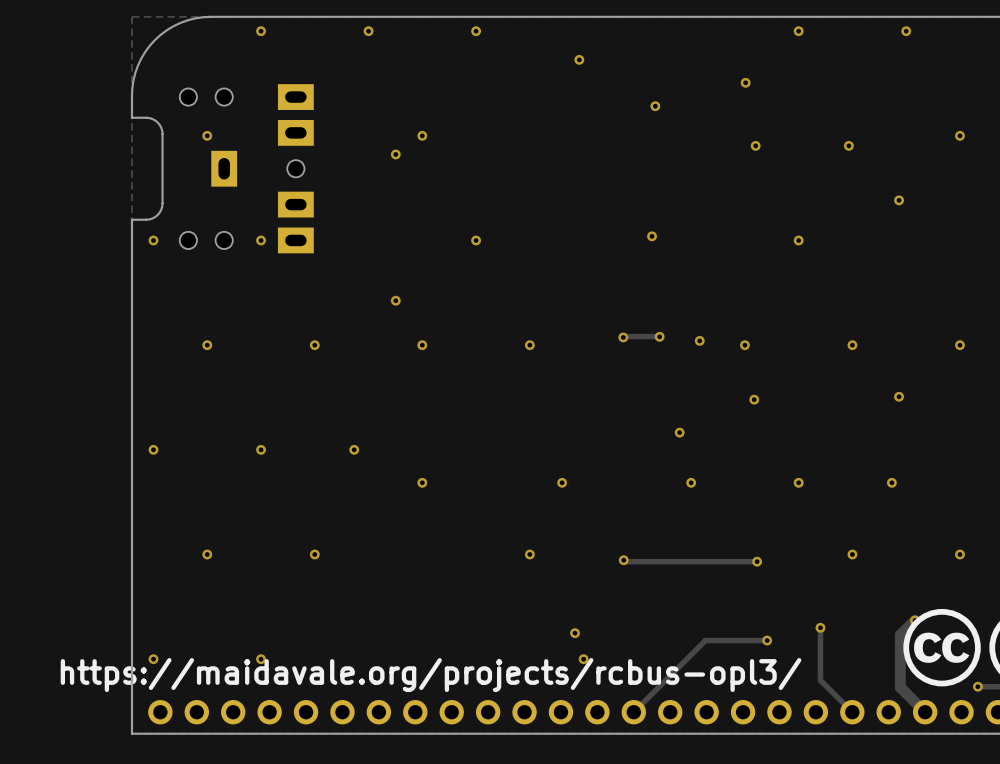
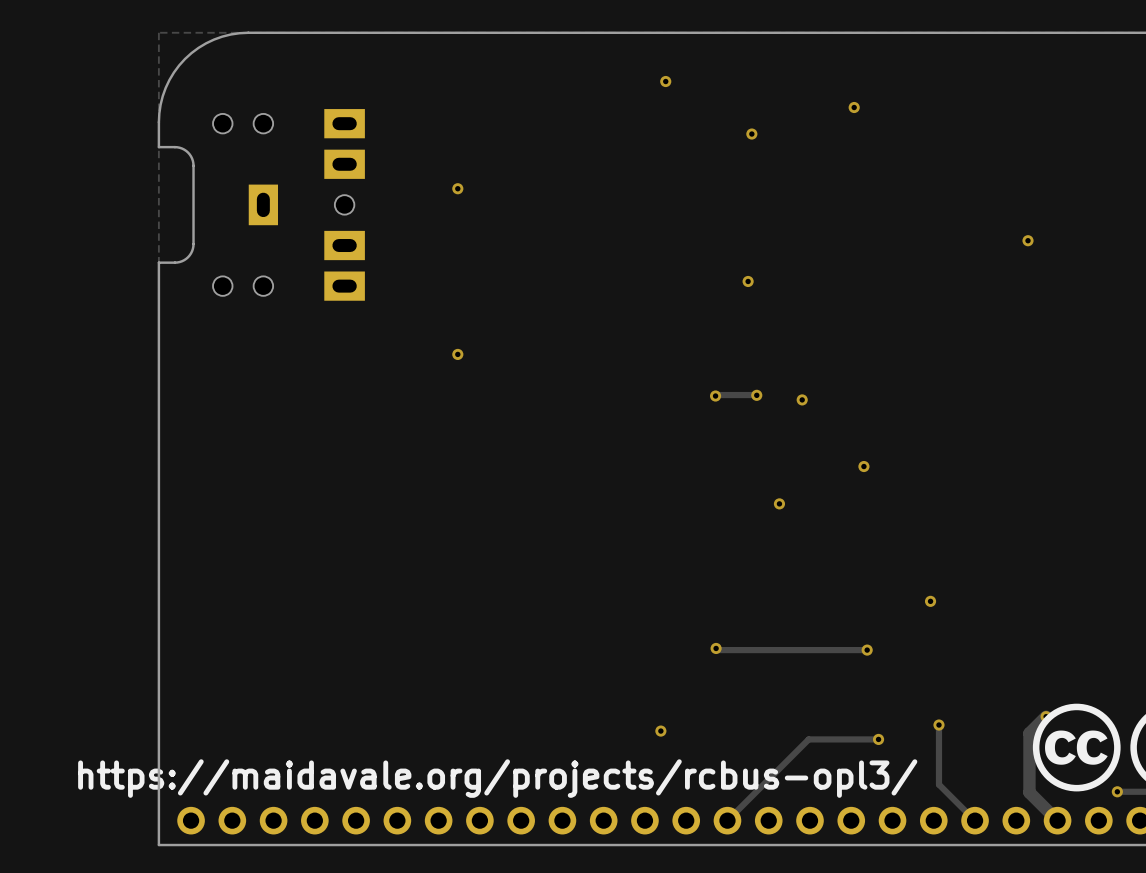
via: (261, 31) -> none
via: (368, 31) -> none
via: (476, 31) -> none
via: (798, 31) -> none
via: (906, 31) -> none
via: (207, 135) -> none
via: (422, 135) -> none
via: (959, 135) -> none
via: (755, 145) -> none
via: (848, 145) -> none
via: (153, 240) -> none
via: (261, 240) -> none
via: (476, 240) -> none
via: (798, 240) -> none
via: (207, 345) -> none
via: (314, 345) -> none
via: (422, 345) -> none
via: (529, 345) -> none
via: (744, 345) -> none
via: (852, 345) -> none
via: (959, 345) -> none
via: (899, 396) -> none
via: (153, 449) -> none
via: (261, 449) -> none
via: (354, 449) -> none
via: (422, 482) -> none
via: (562, 482) -> none
via: (691, 482) -> none
via: (798, 482) -> none
via: (891, 482) -> none
via: none -> (930, 601)
via: (207, 554) -> none
via: (314, 554) -> none
via: (529, 554) -> none
via: (852, 554) -> none
via: (959, 554) -> none
via: (153, 659) -> none
via: (261, 659) -> none
via: (583, 659) -> none

